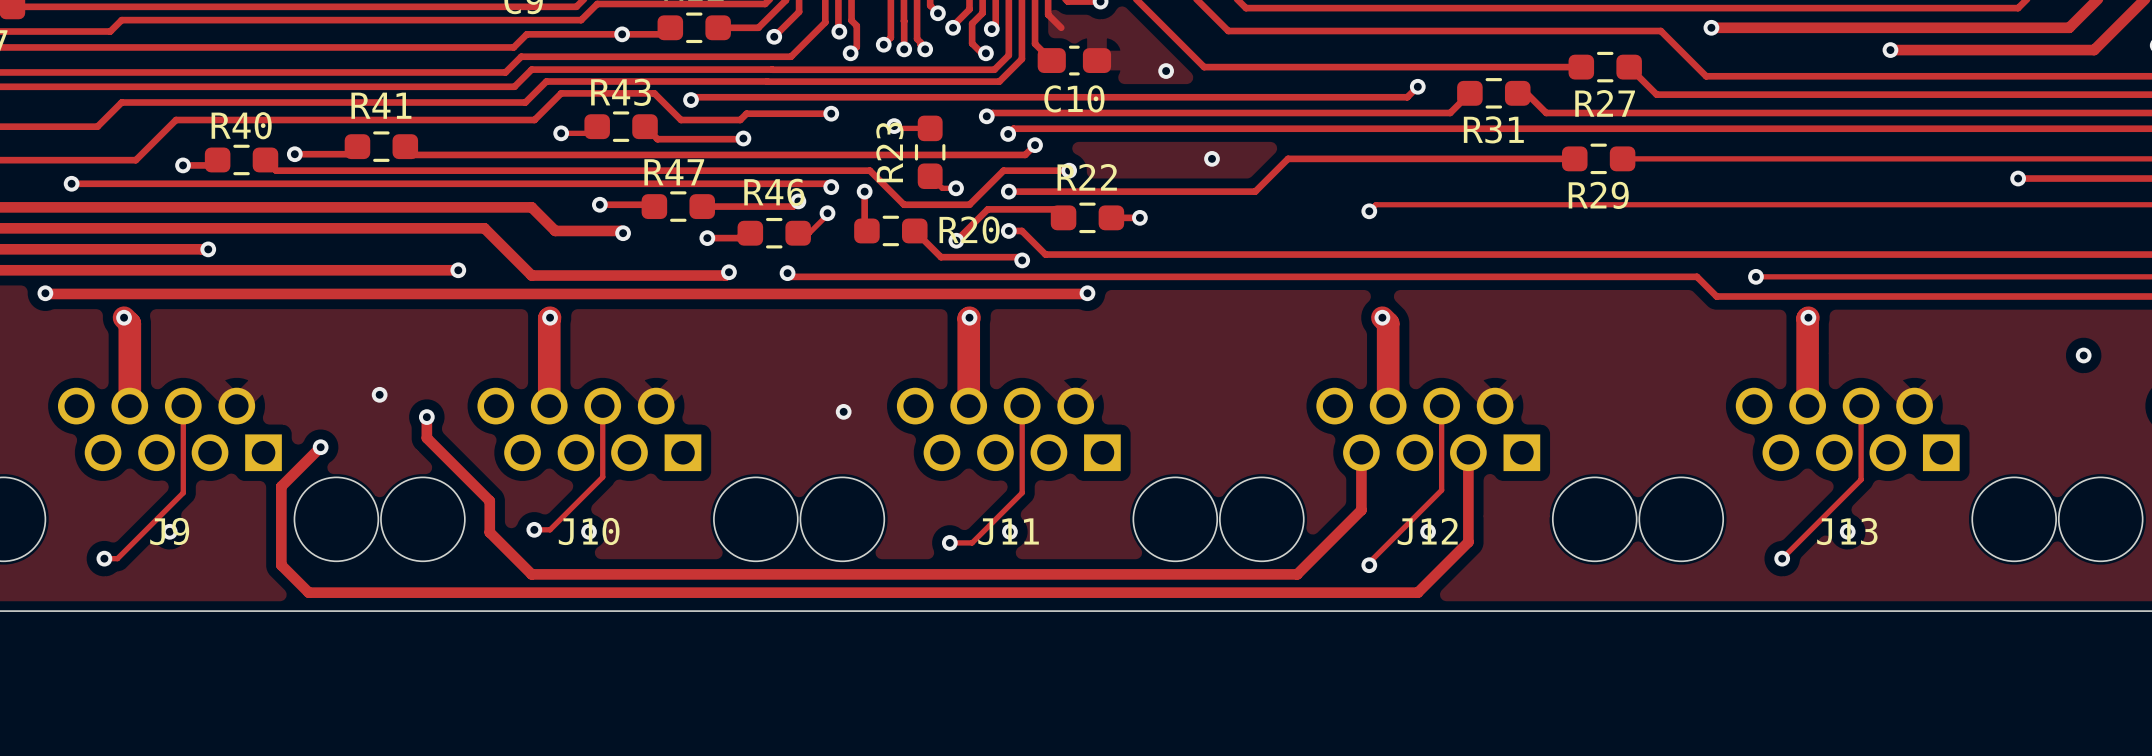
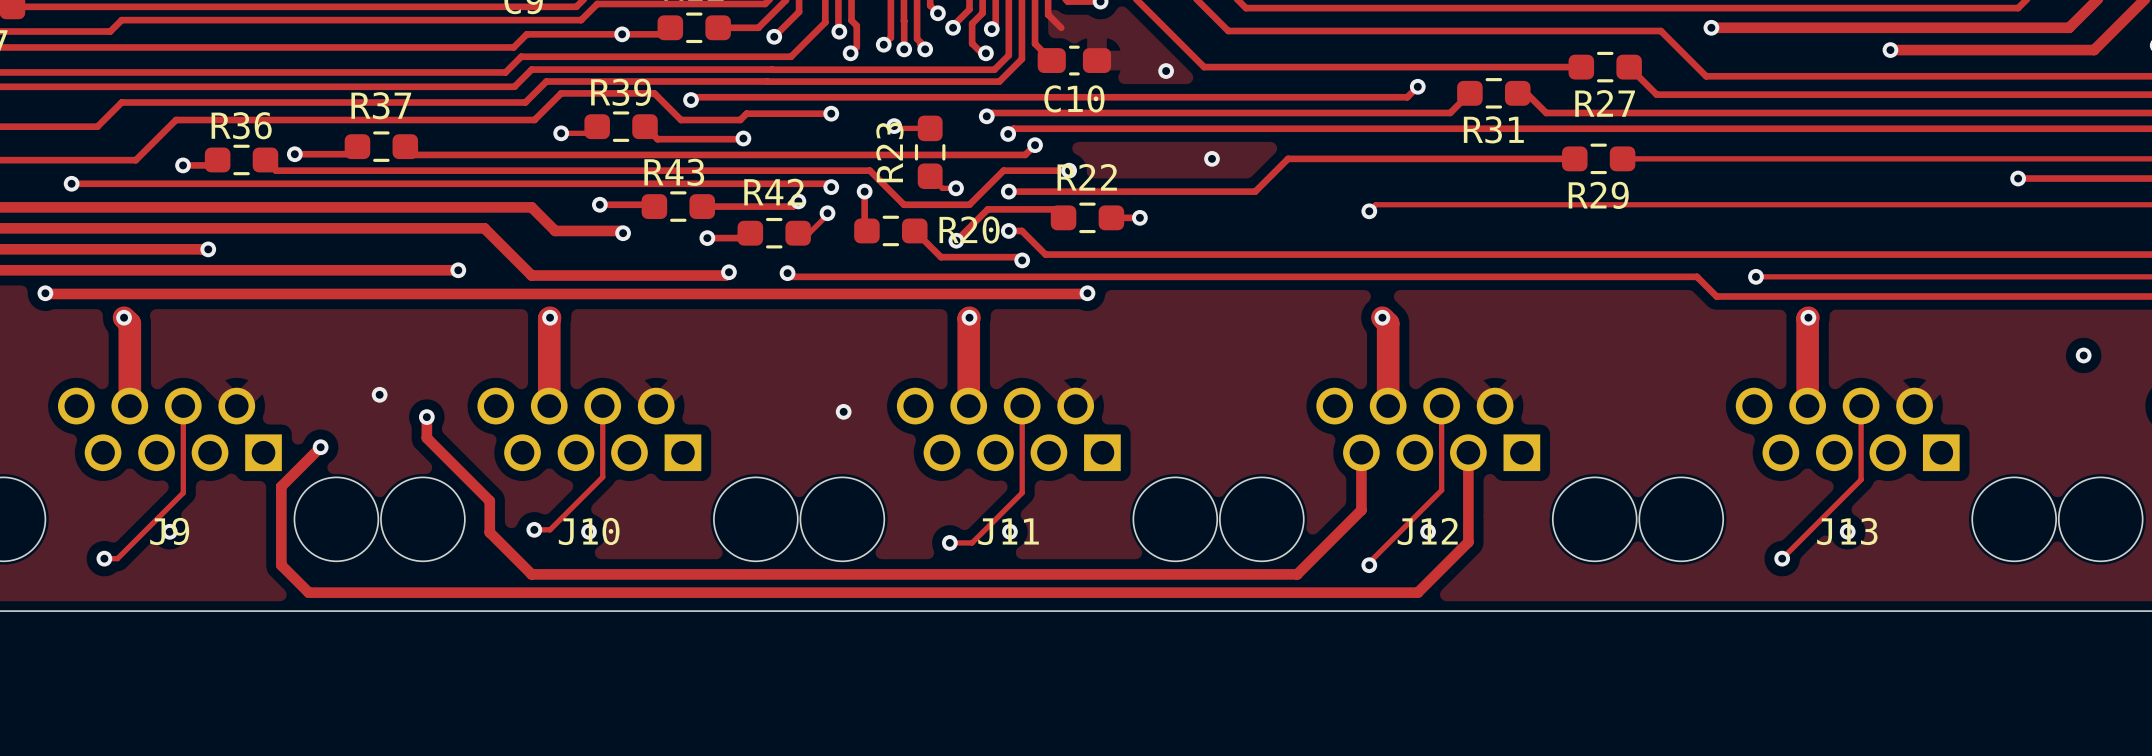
R43 name: R43 (621, 92) -> R39 (621, 92)
R41 name: R41 (381, 105) -> R37 (381, 105)
R40 name: R40 (241, 125) -> R36 (241, 125)
R47 name: R47 (674, 172) -> R43 (674, 172)
R46 name: R46 (774, 192) -> R42 (773, 192)

